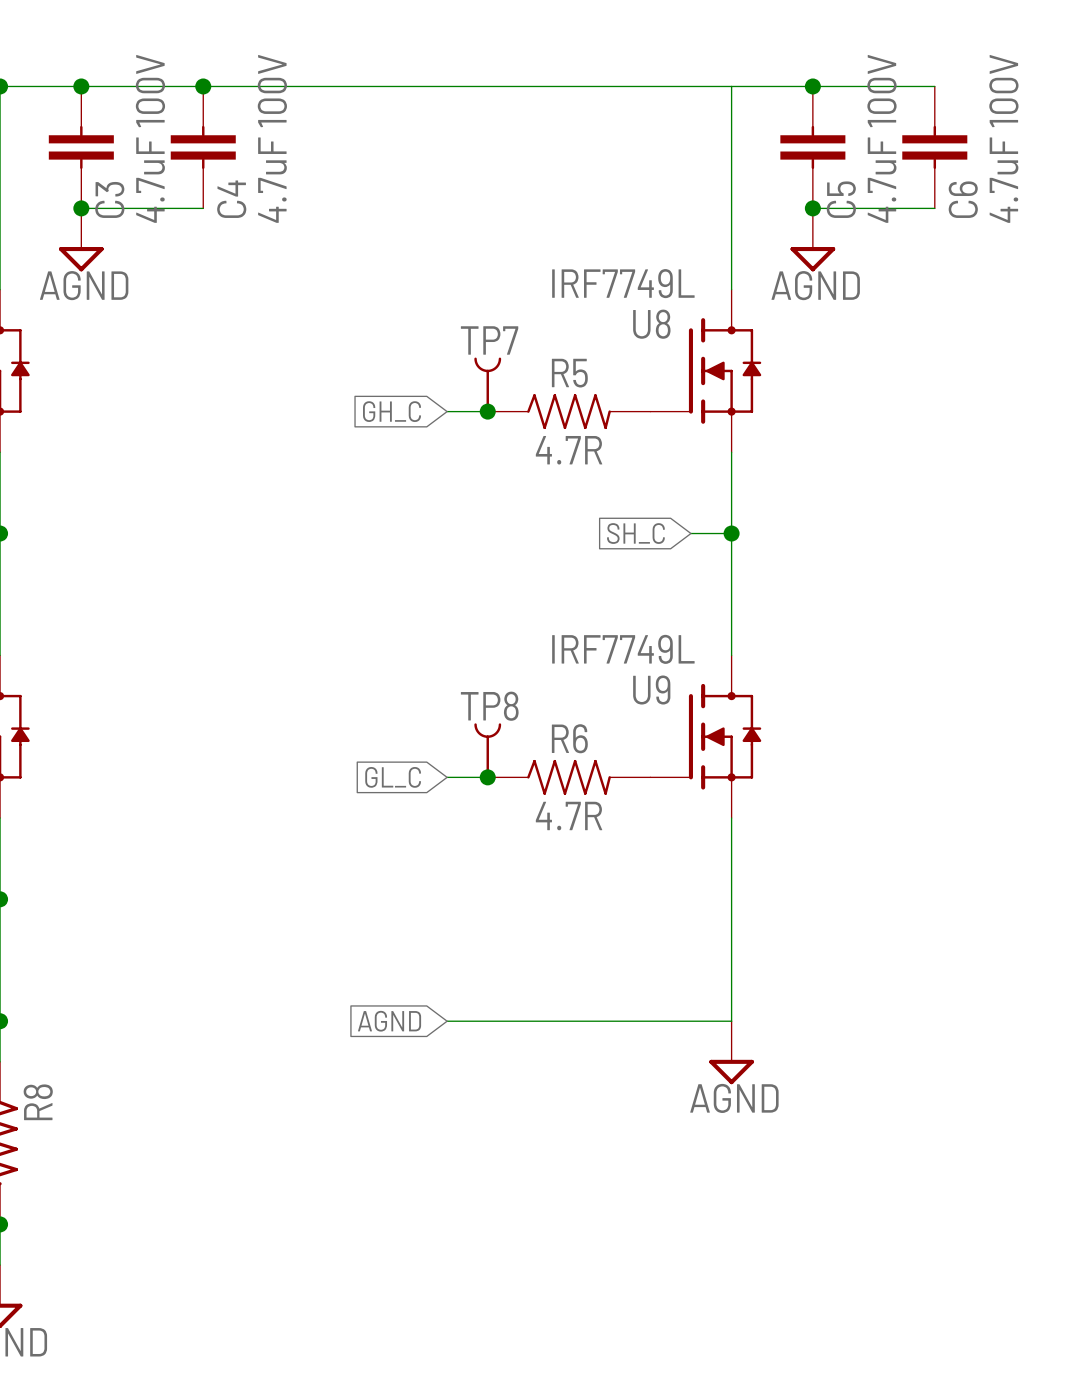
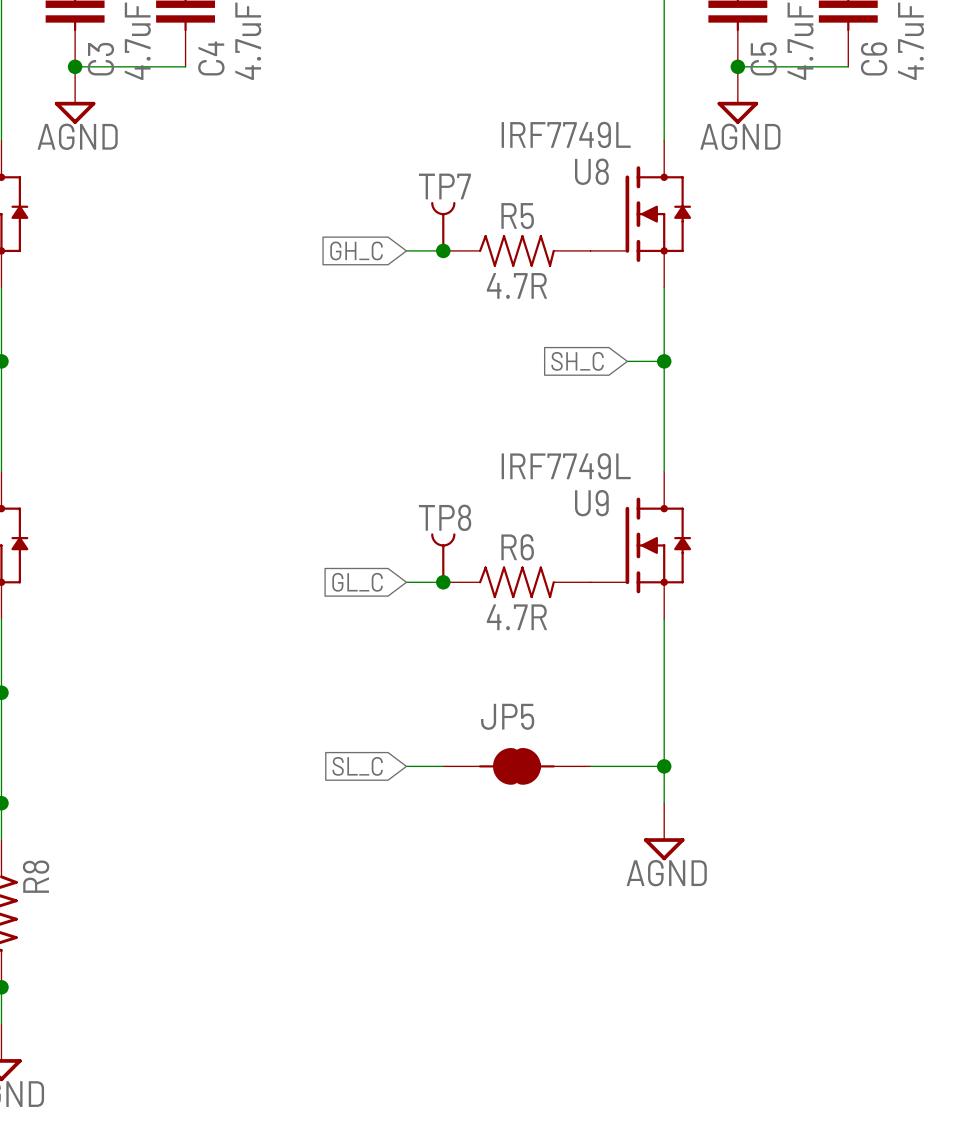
global label: none -> SL_C (357, 766)
wire: none -> (406, 766) (443, 766)
JP5: none -> (516, 766)
wire: none -> (590, 766) (664, 766)
junction: none -> (664, 766)
global label: AGND (389, 1021) -> none
wire: (447, 1021) (731, 1021) -> none

